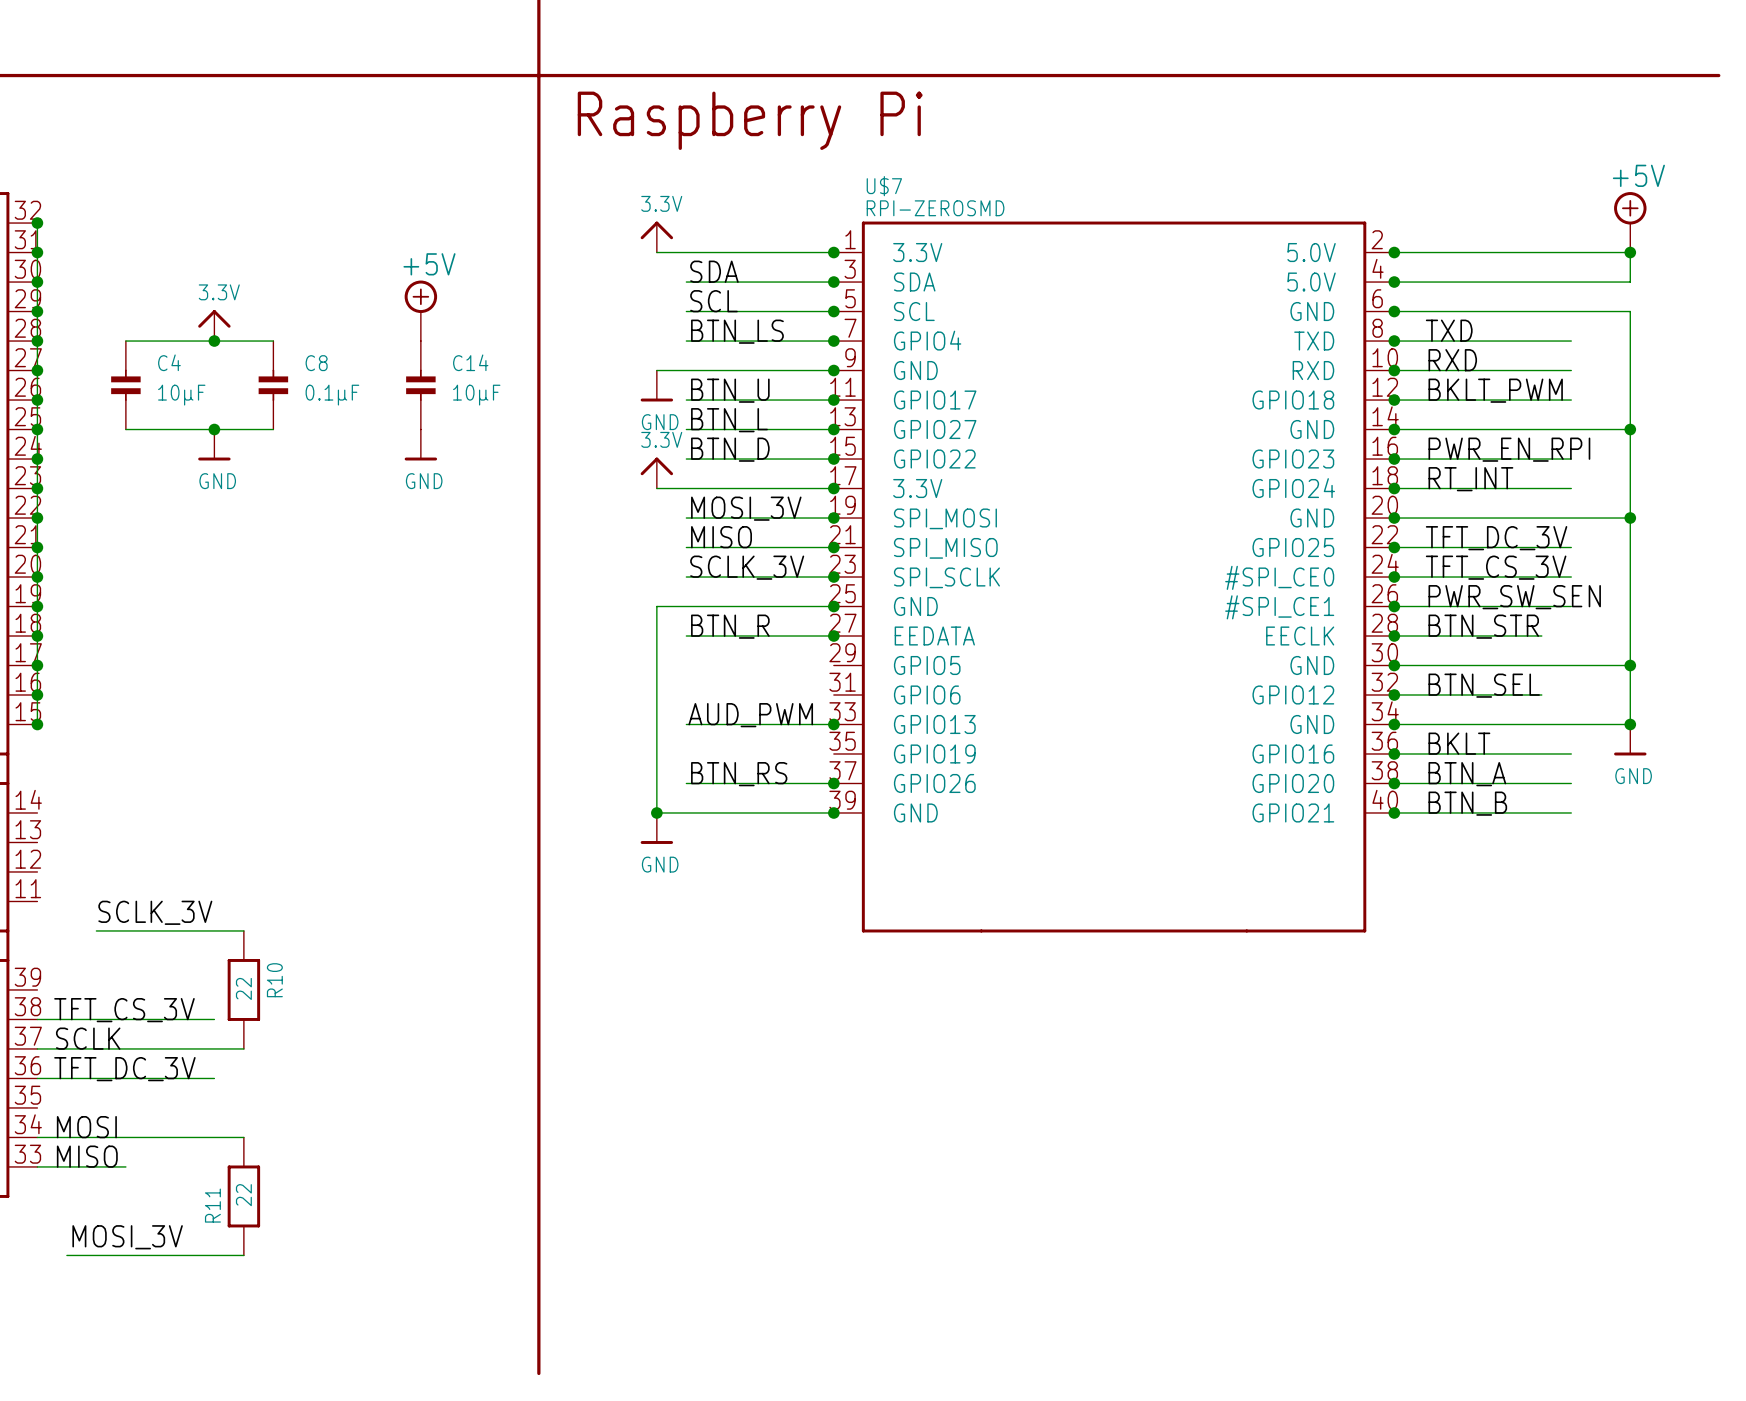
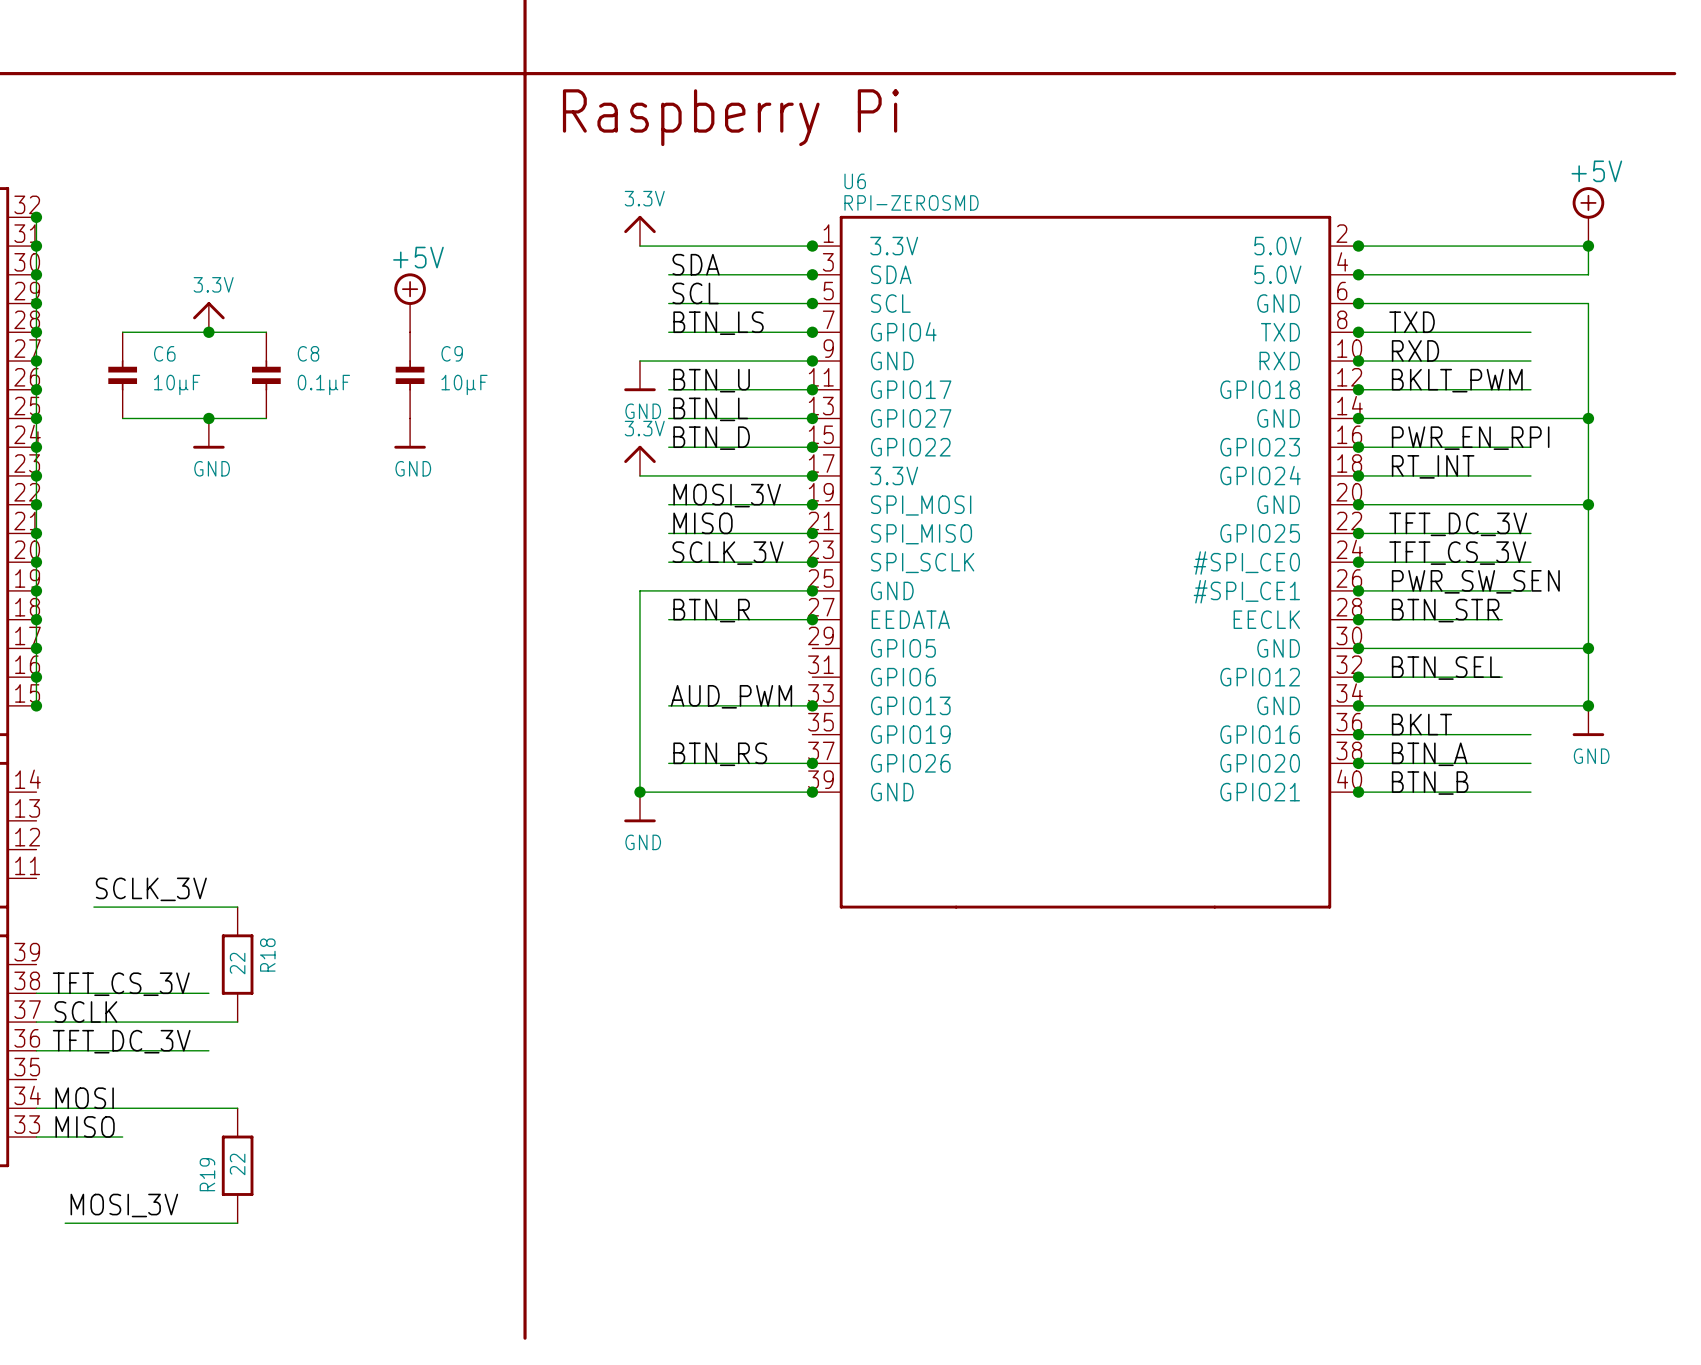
U$7 name: U$7 (884, 186) -> U6 (855, 181)
C4 name: C4 (169, 362) -> C6 (164, 353)
C14 name: C14 (470, 362) -> C9 (452, 353)
R10 name: R10 (274, 980) -> R18 (267, 955)
R11 name: R11 (212, 1205) -> R19 (207, 1174)

